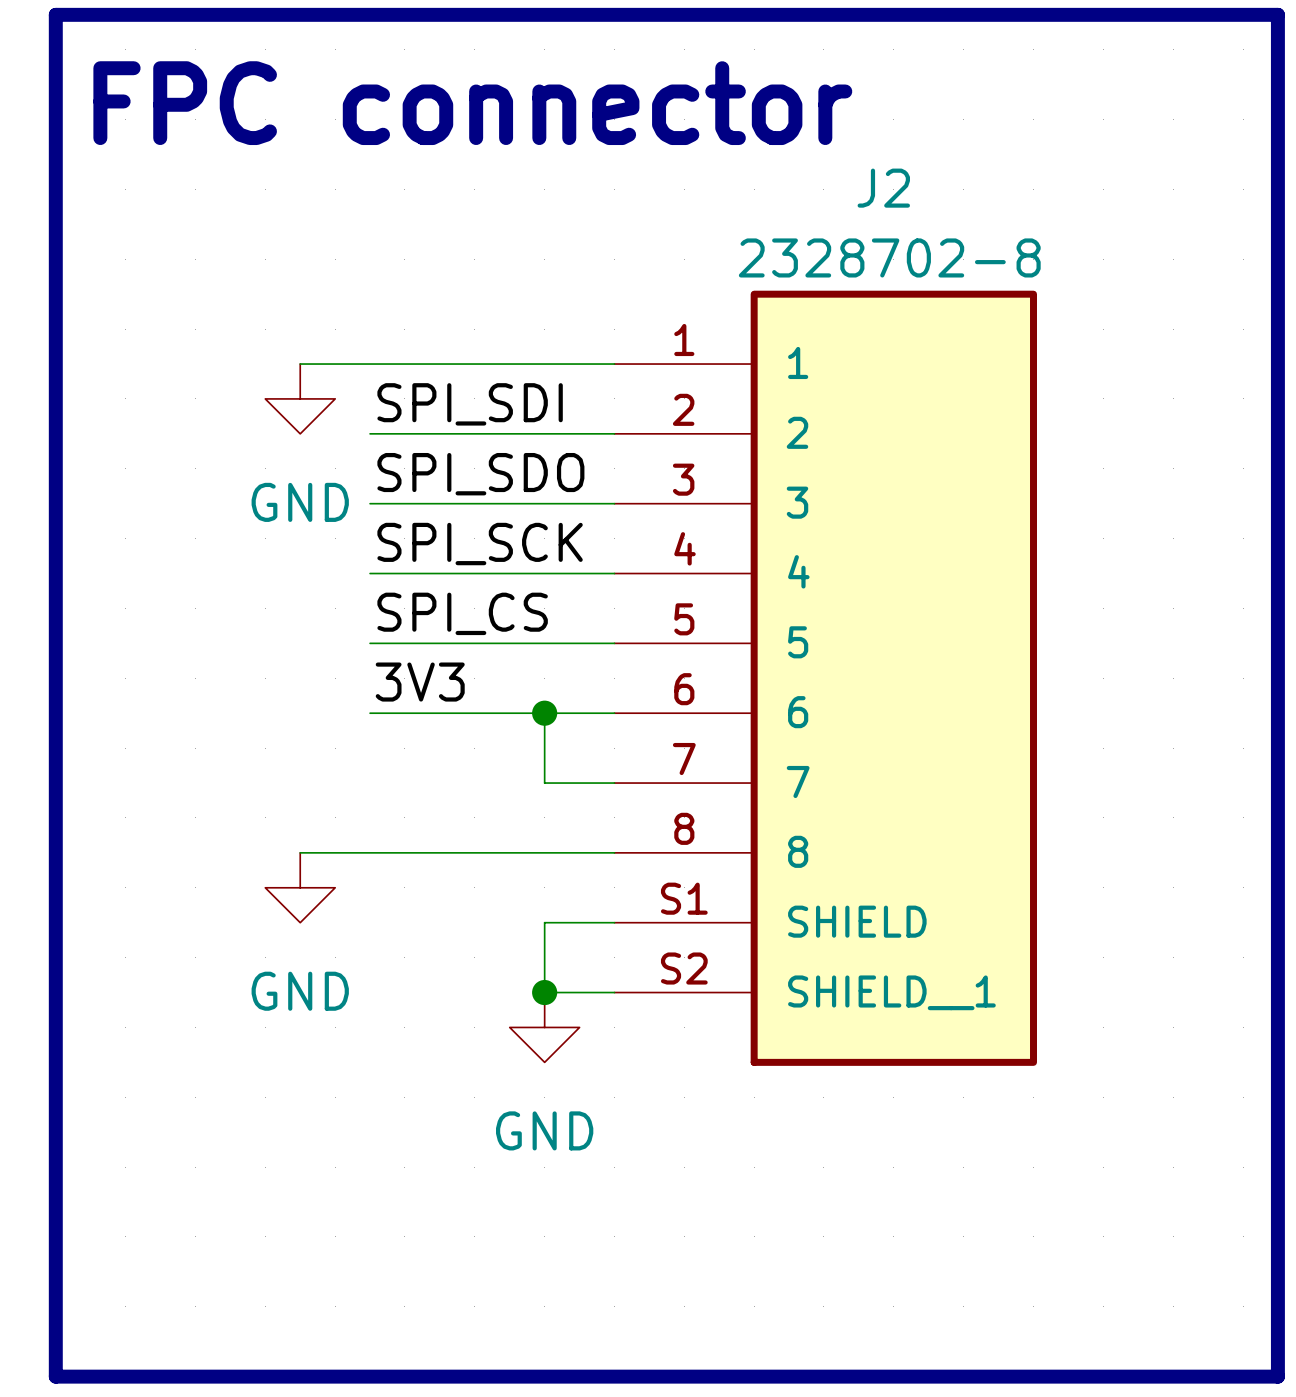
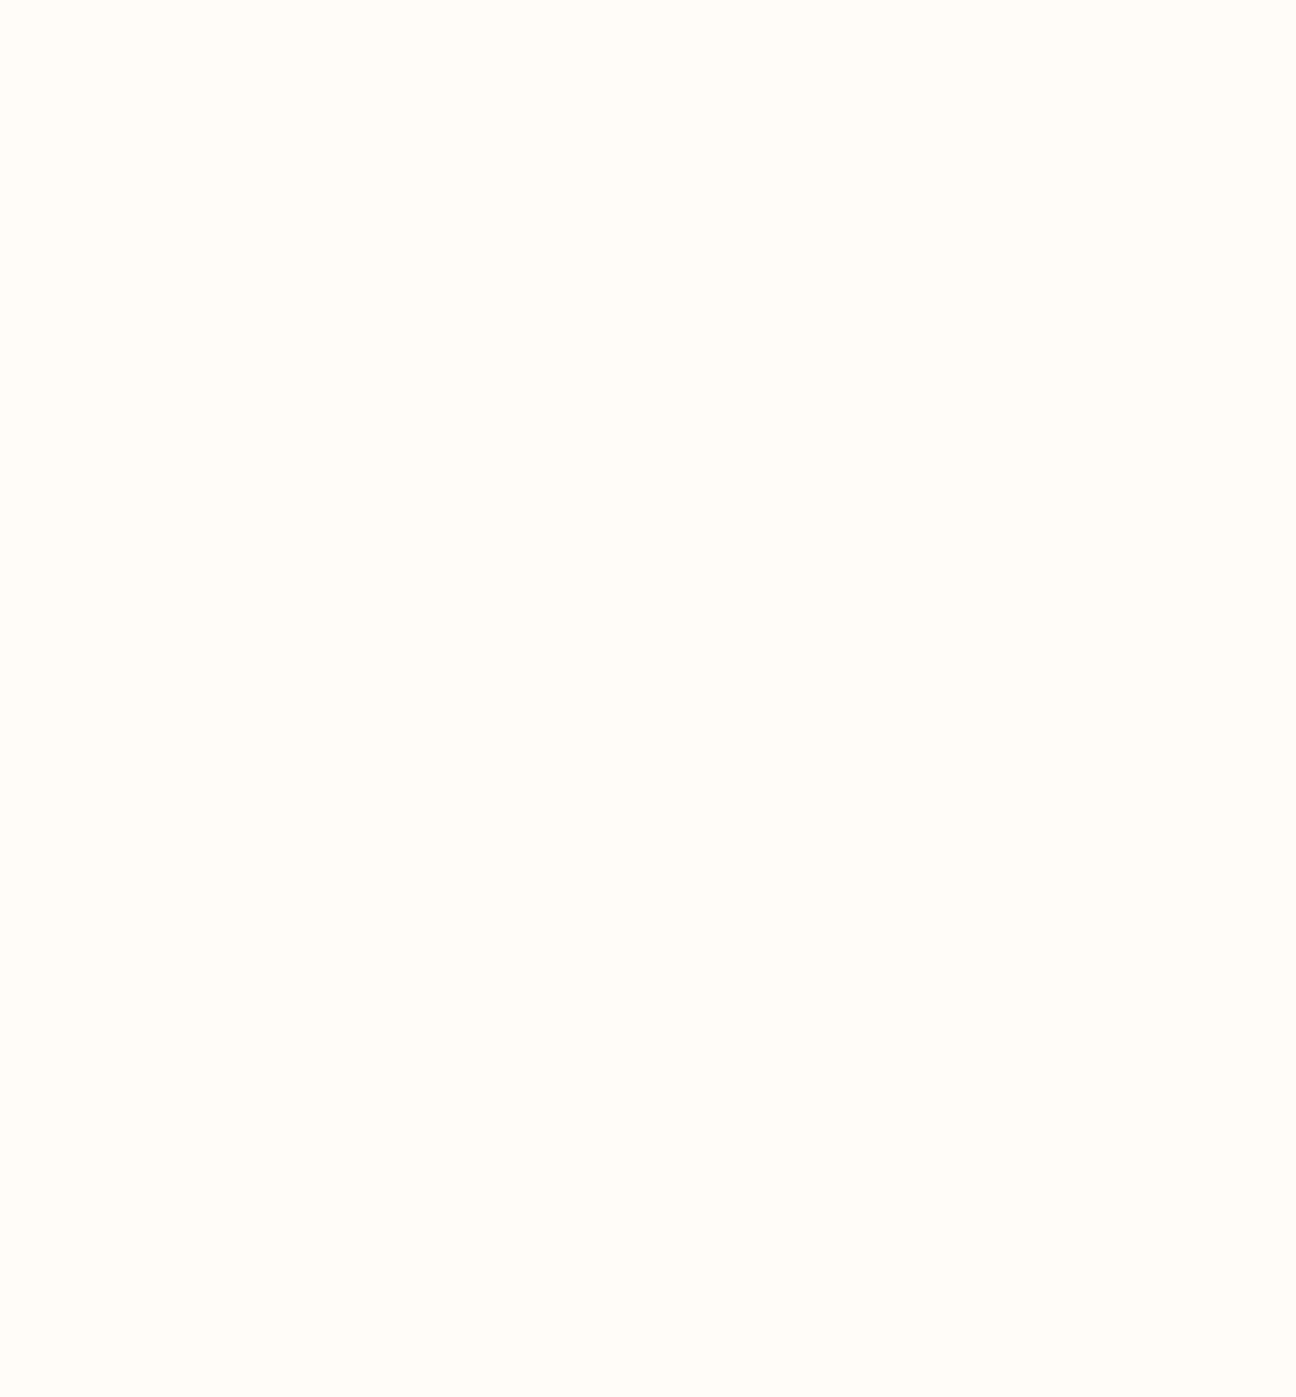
line: (55, 14) (1277, 14) (1277, 1376) (55, 1376) (55, 14) -> none
text: FPC connector (472, 103) -> none
wire: (300, 364) (614, 364) -> none
power symbol: GND (300, 398) -> none
label: SPI_SDI (470, 404) -> none
wire: (370, 433) (614, 433) -> none
label: SPI_SDO (480, 474) -> none
wire: (370, 503) (614, 503) -> none
label: SPI_SCK (480, 544) -> none
wire: (370, 573) (614, 573) -> none
label: SPI_CS (462, 613) -> none
wire: (370, 643) (614, 643) -> none
J2: 2328702-8 (825, 678) -> none
label: 3V3 (420, 682) -> none
wire: (370, 713) (614, 713) -> none
wire: (544, 713) (544, 783) (614, 783) -> none
junction: (544, 713) -> none
wire: (300, 852) (614, 852) -> none
power symbol: GND (300, 887) -> none
wire: (614, 922) (544, 922) (544, 992) (614, 992) -> none
junction: (544, 992) -> none
power symbol: GND (544, 1027) -> none

